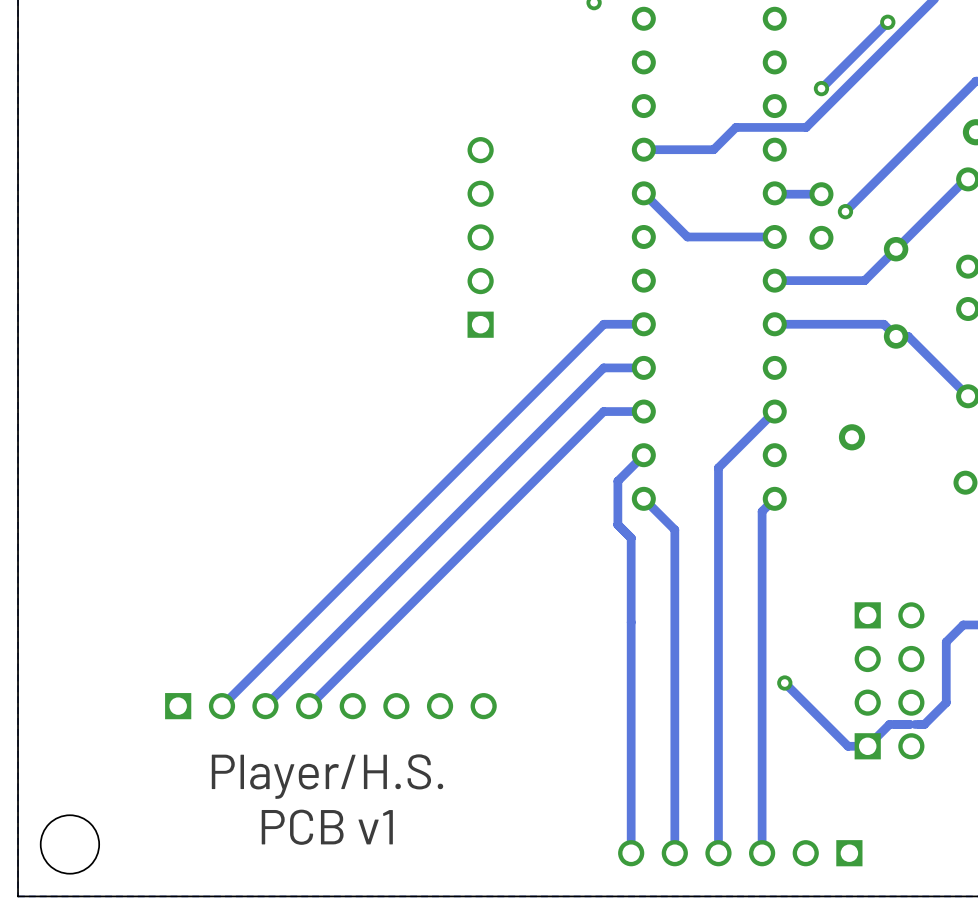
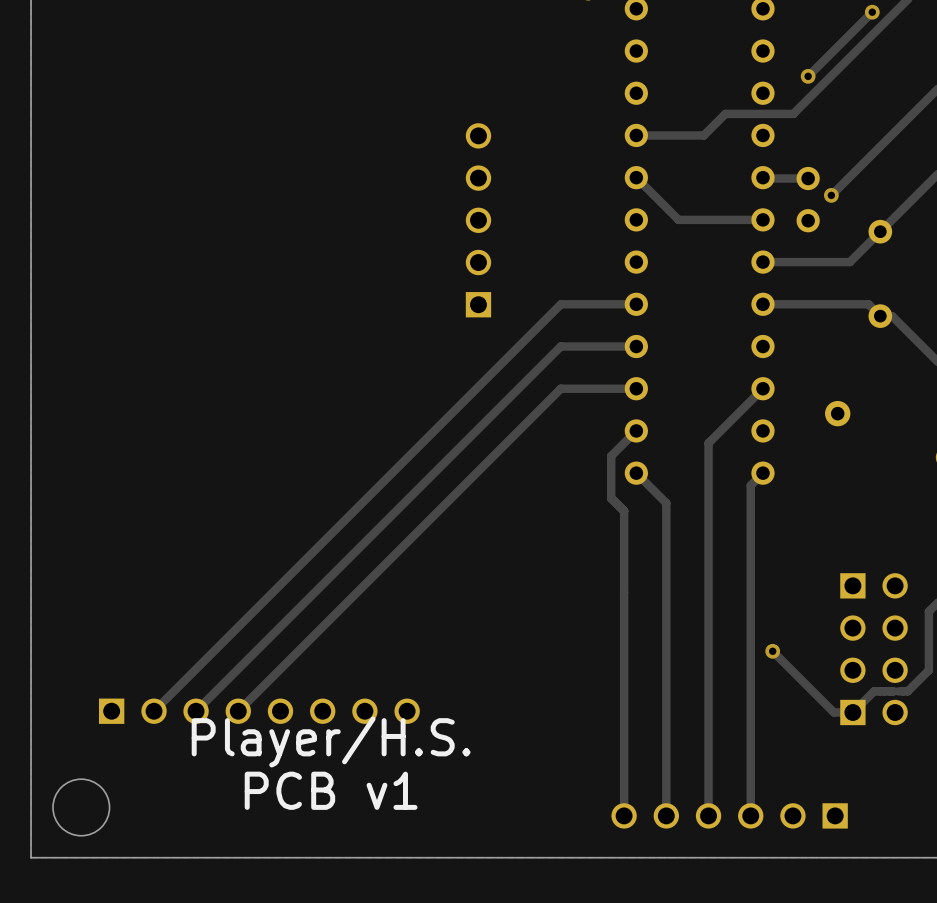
track: (603, 324) (221, 706) (603, 324) -> (597, 304) (560, 304) (154, 711)
track: (603, 367) (265, 706) (603, 367) -> (597, 346) (560, 346) (196, 711)
track: (603, 411) (309, 706) (603, 411) -> (597, 388) (560, 388) (238, 711)
part position: (330, 706) -> (259, 711)

